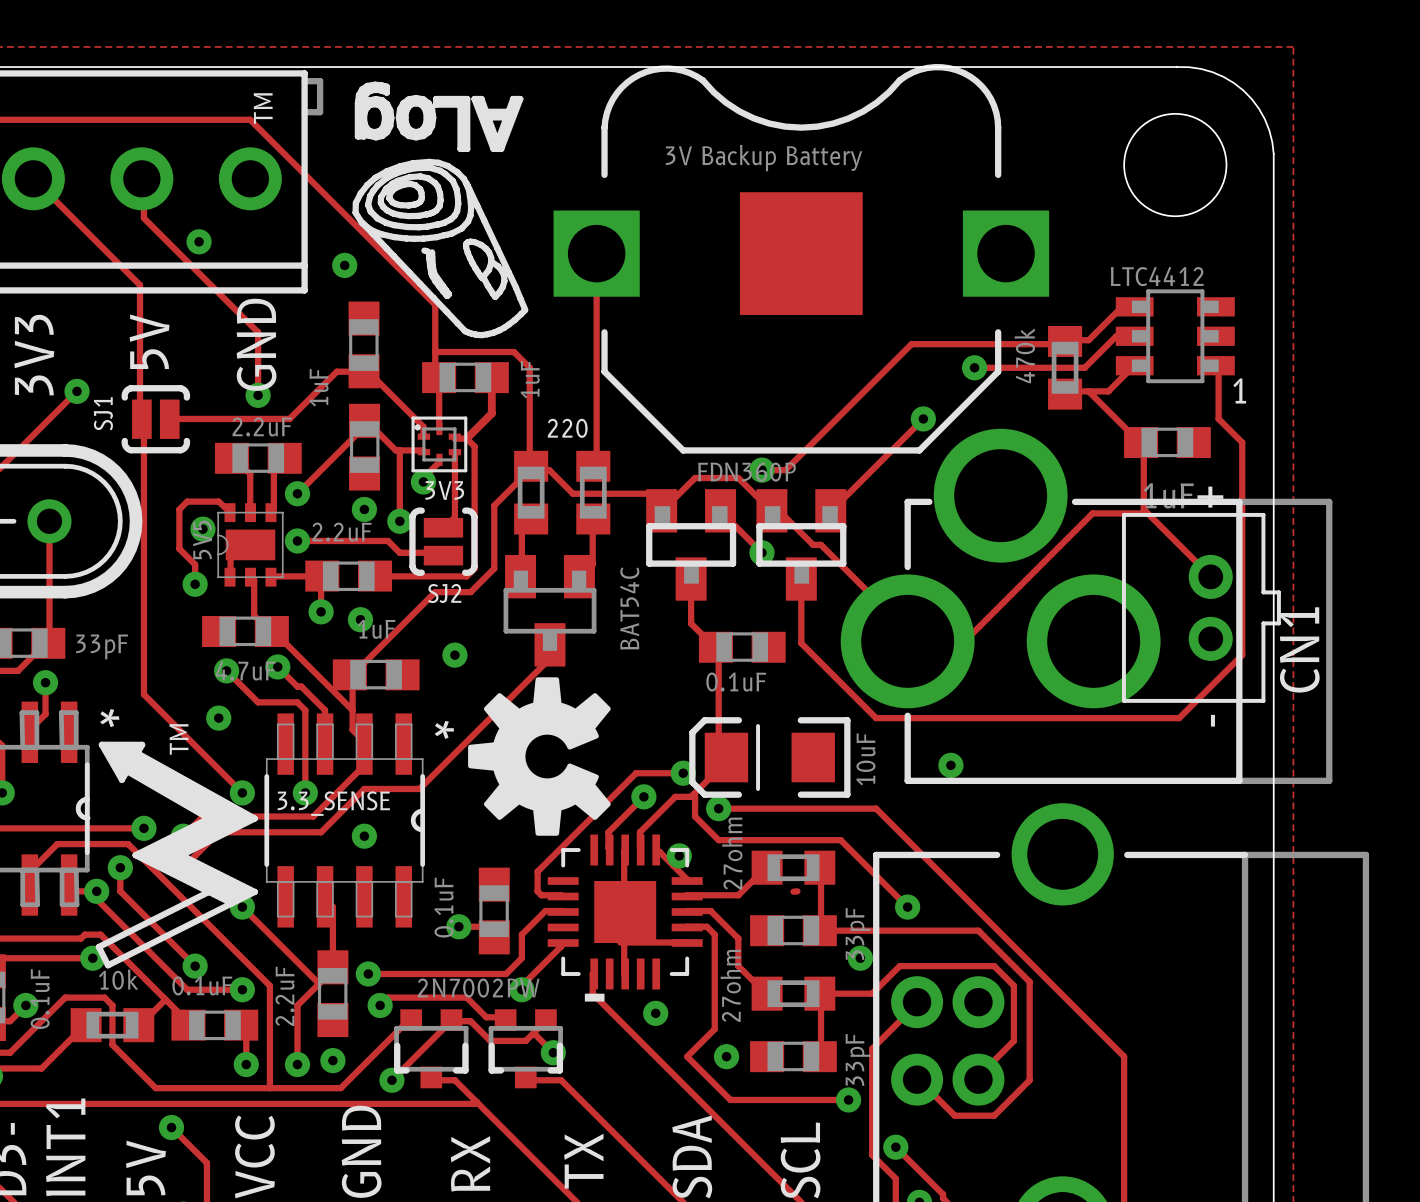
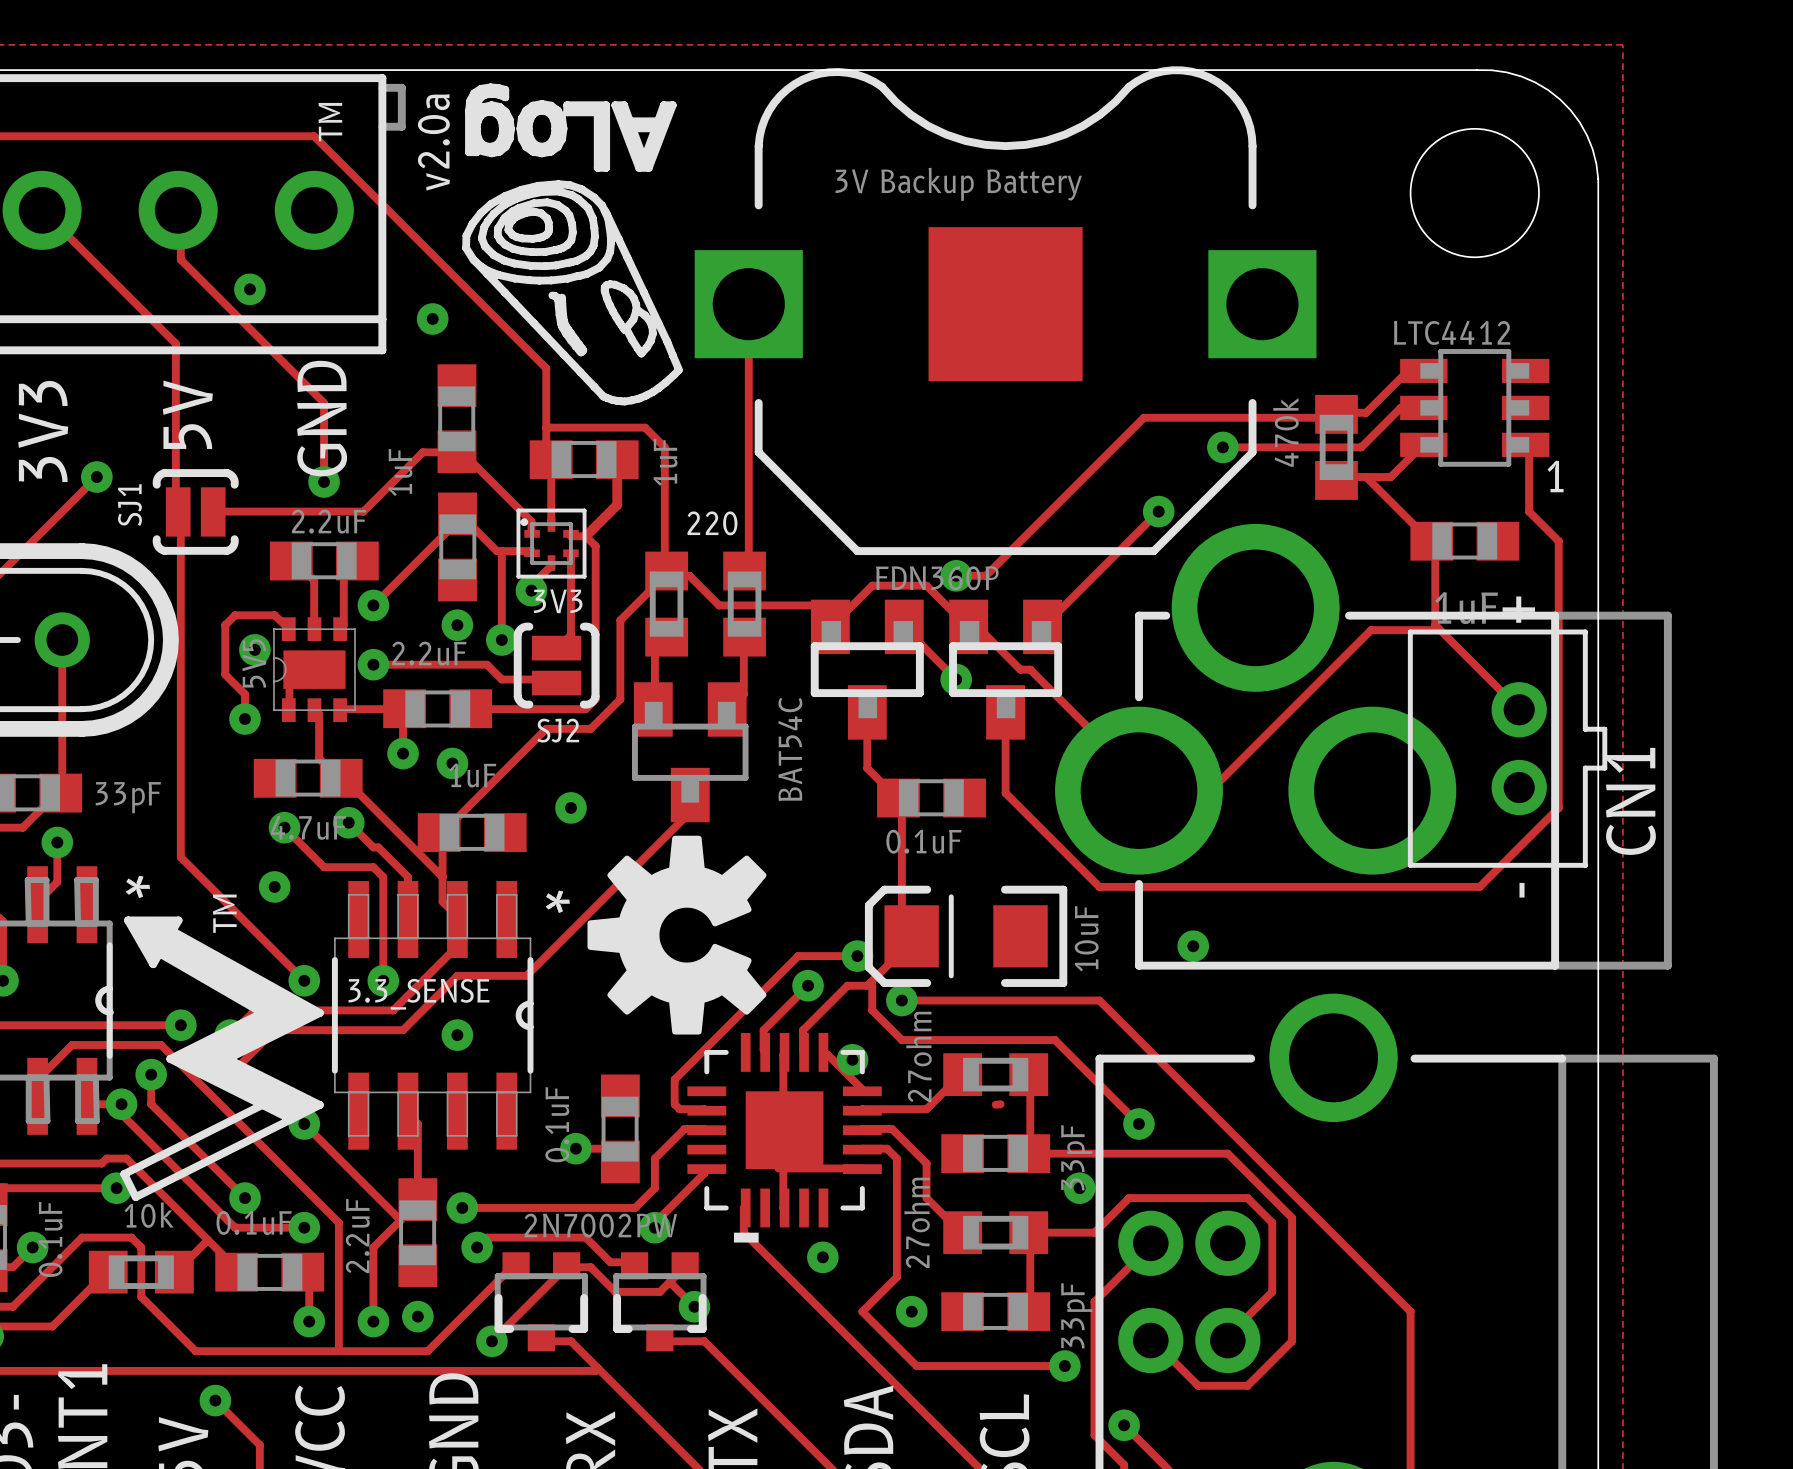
text: none -> v2.0a (433, 142)
drawing position: (440, 209) -> (572, 244)

